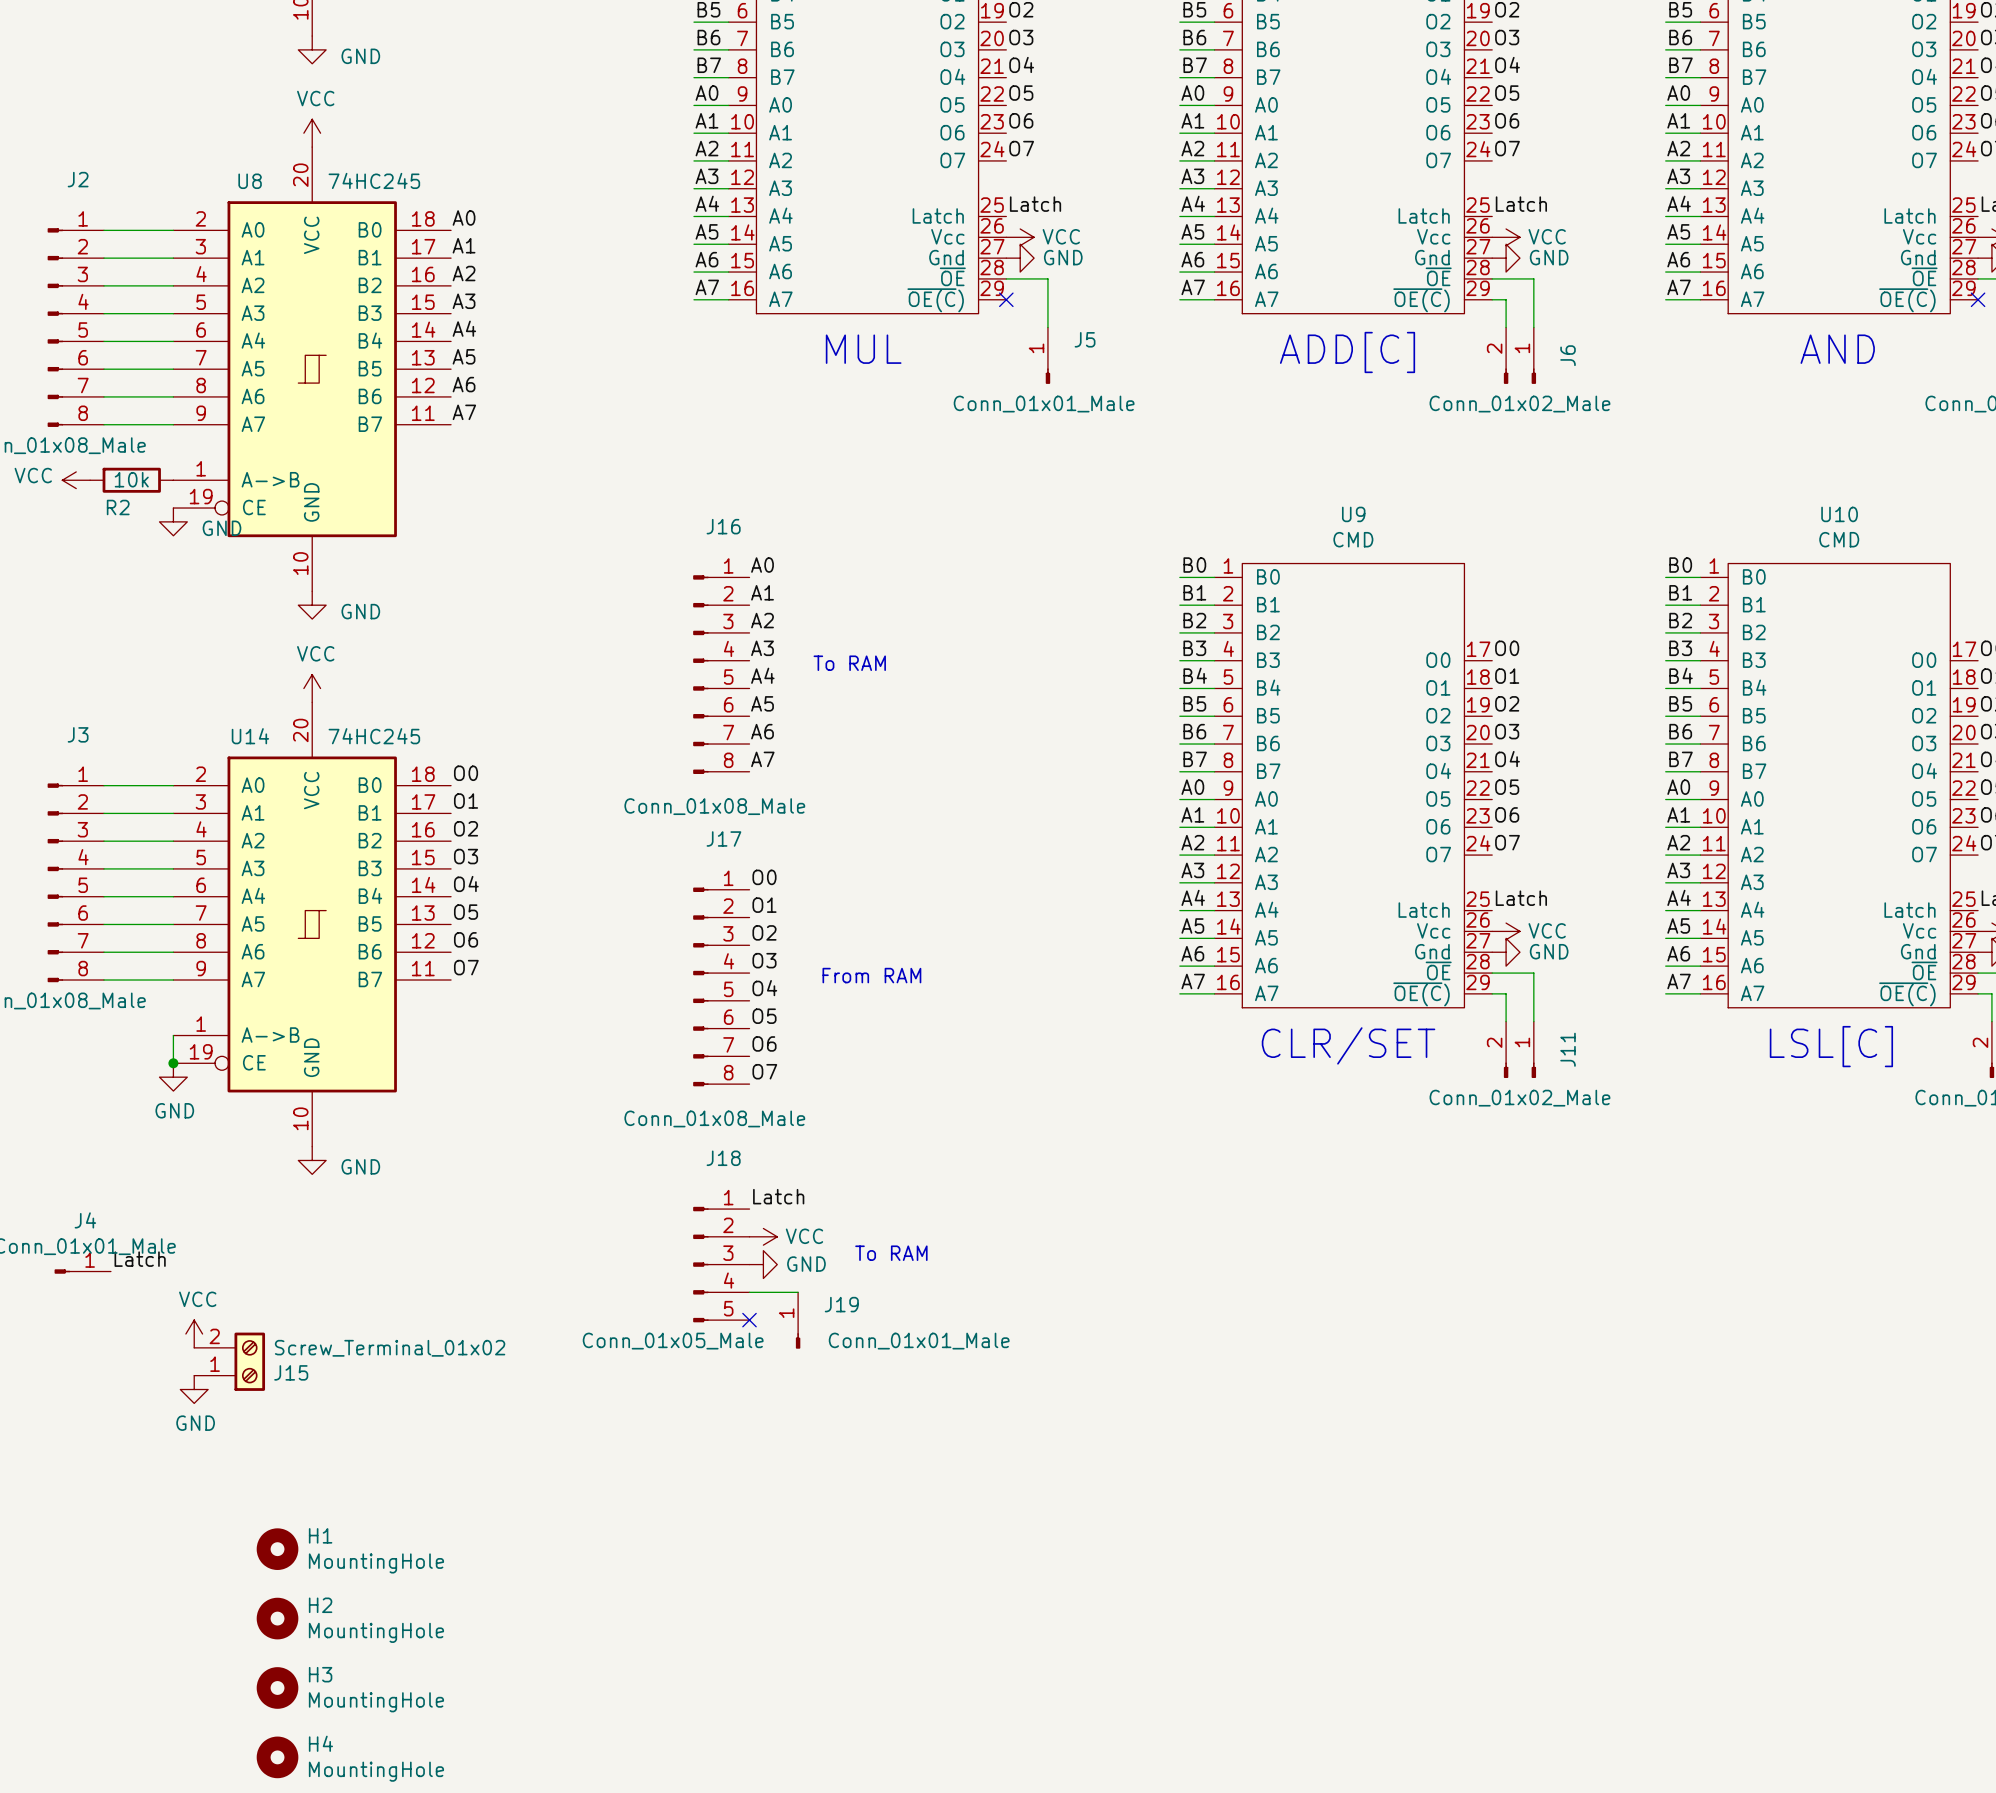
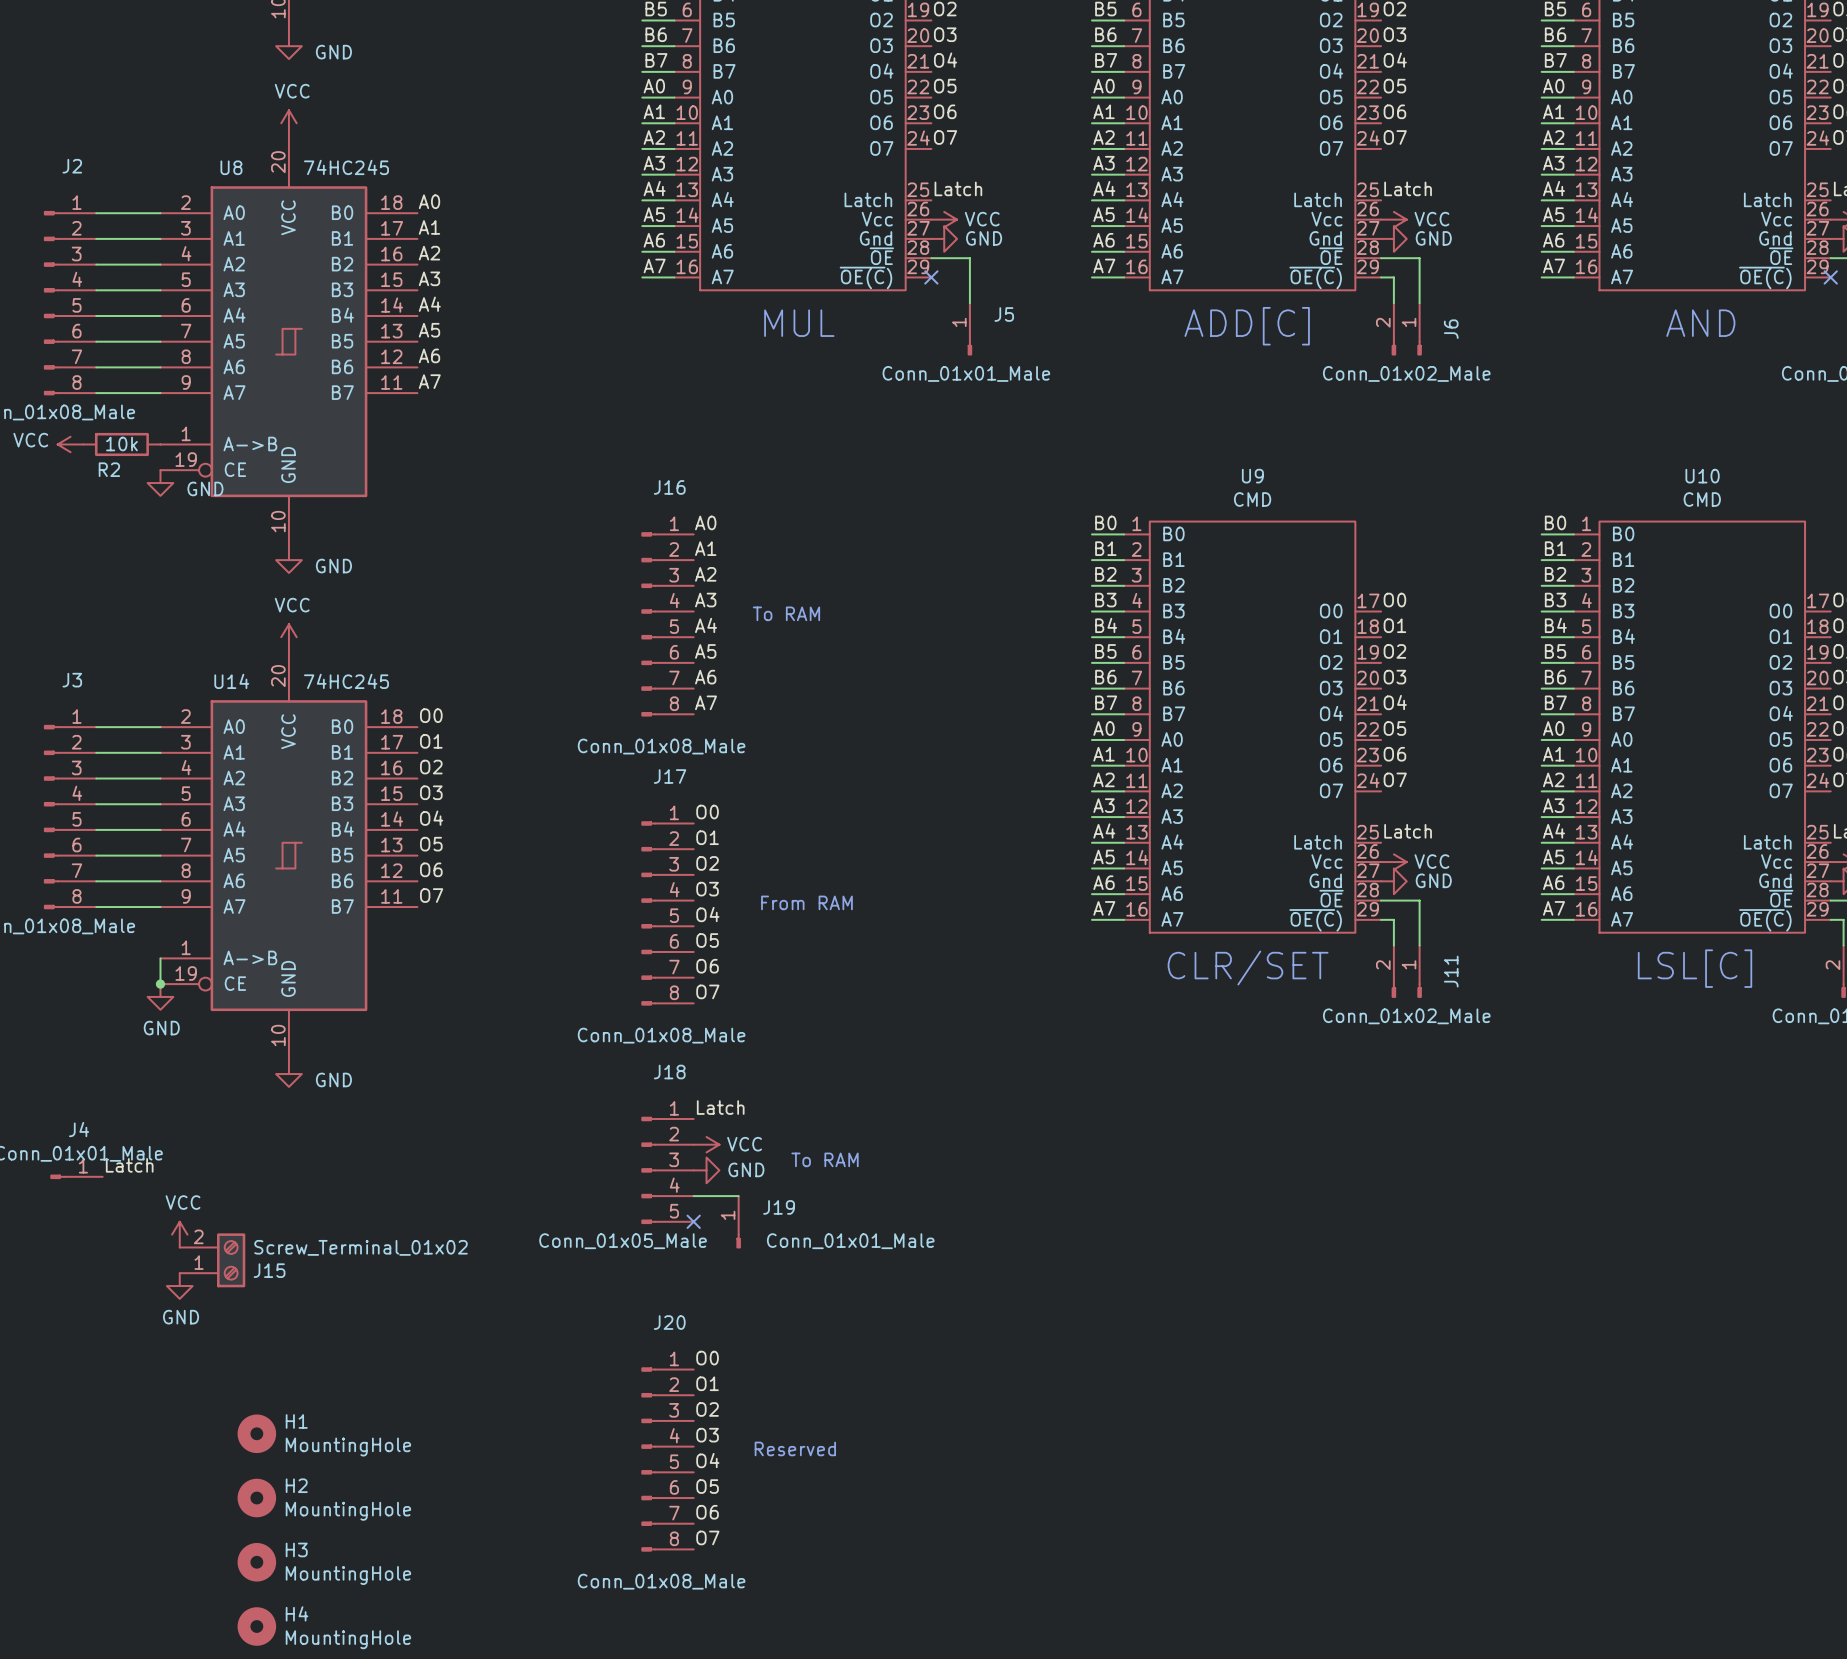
label: none -> O0 (707, 1358)
label: none -> O1 (707, 1383)
label: none -> O2 (707, 1409)
label: none -> O3 (707, 1435)
text: none -> Reserved (795, 1448)
J20: none -> Conn_01x08_Male (667, 1459)
label: none -> O4 (707, 1460)
label: none -> O5 (707, 1486)
label: none -> O6 (707, 1512)
label: none -> O7 (707, 1537)

